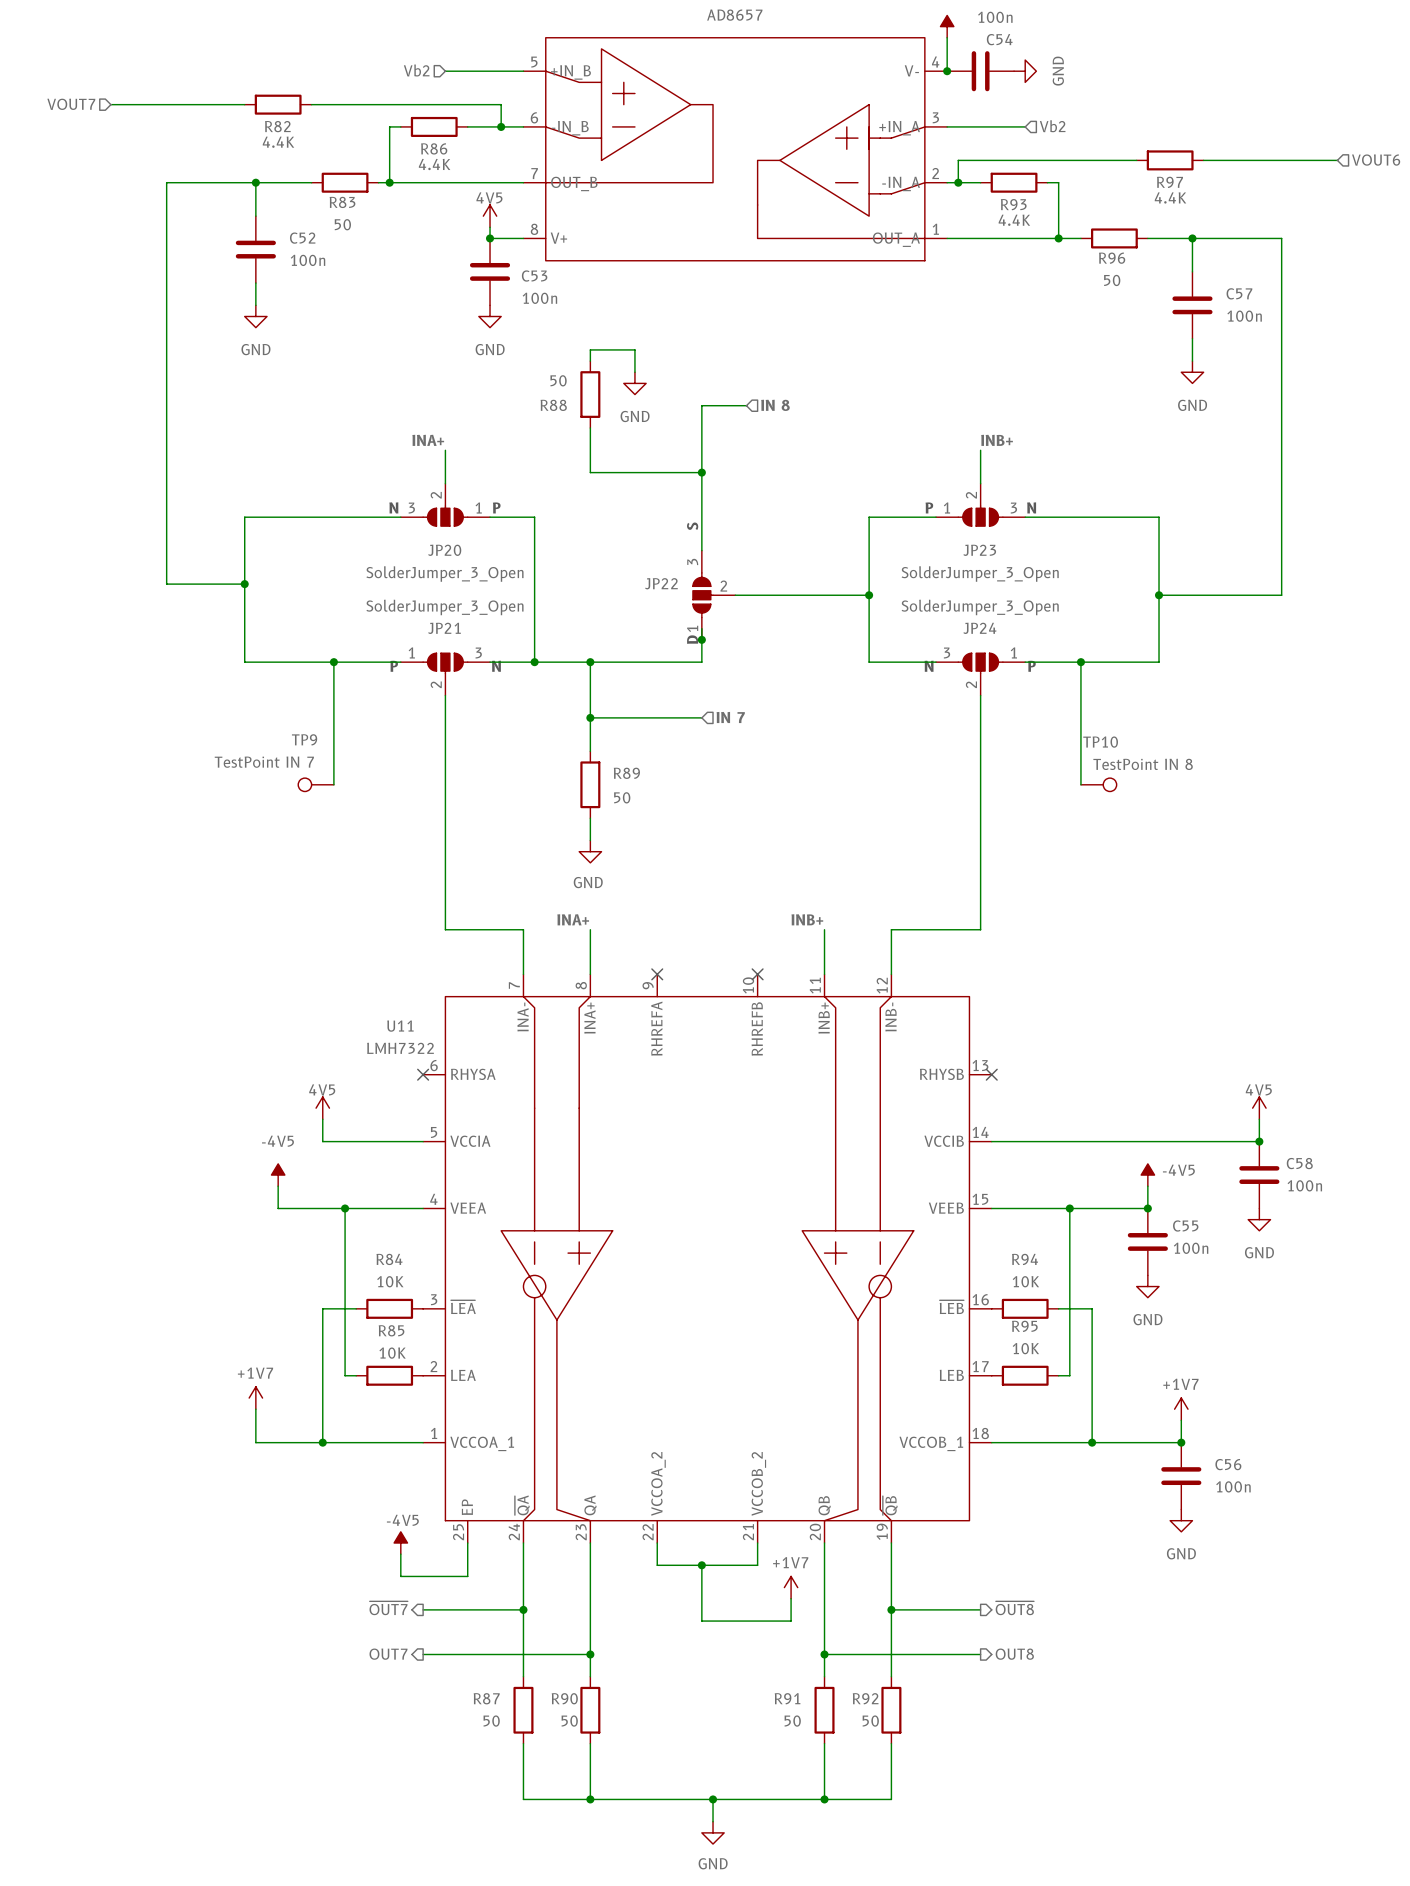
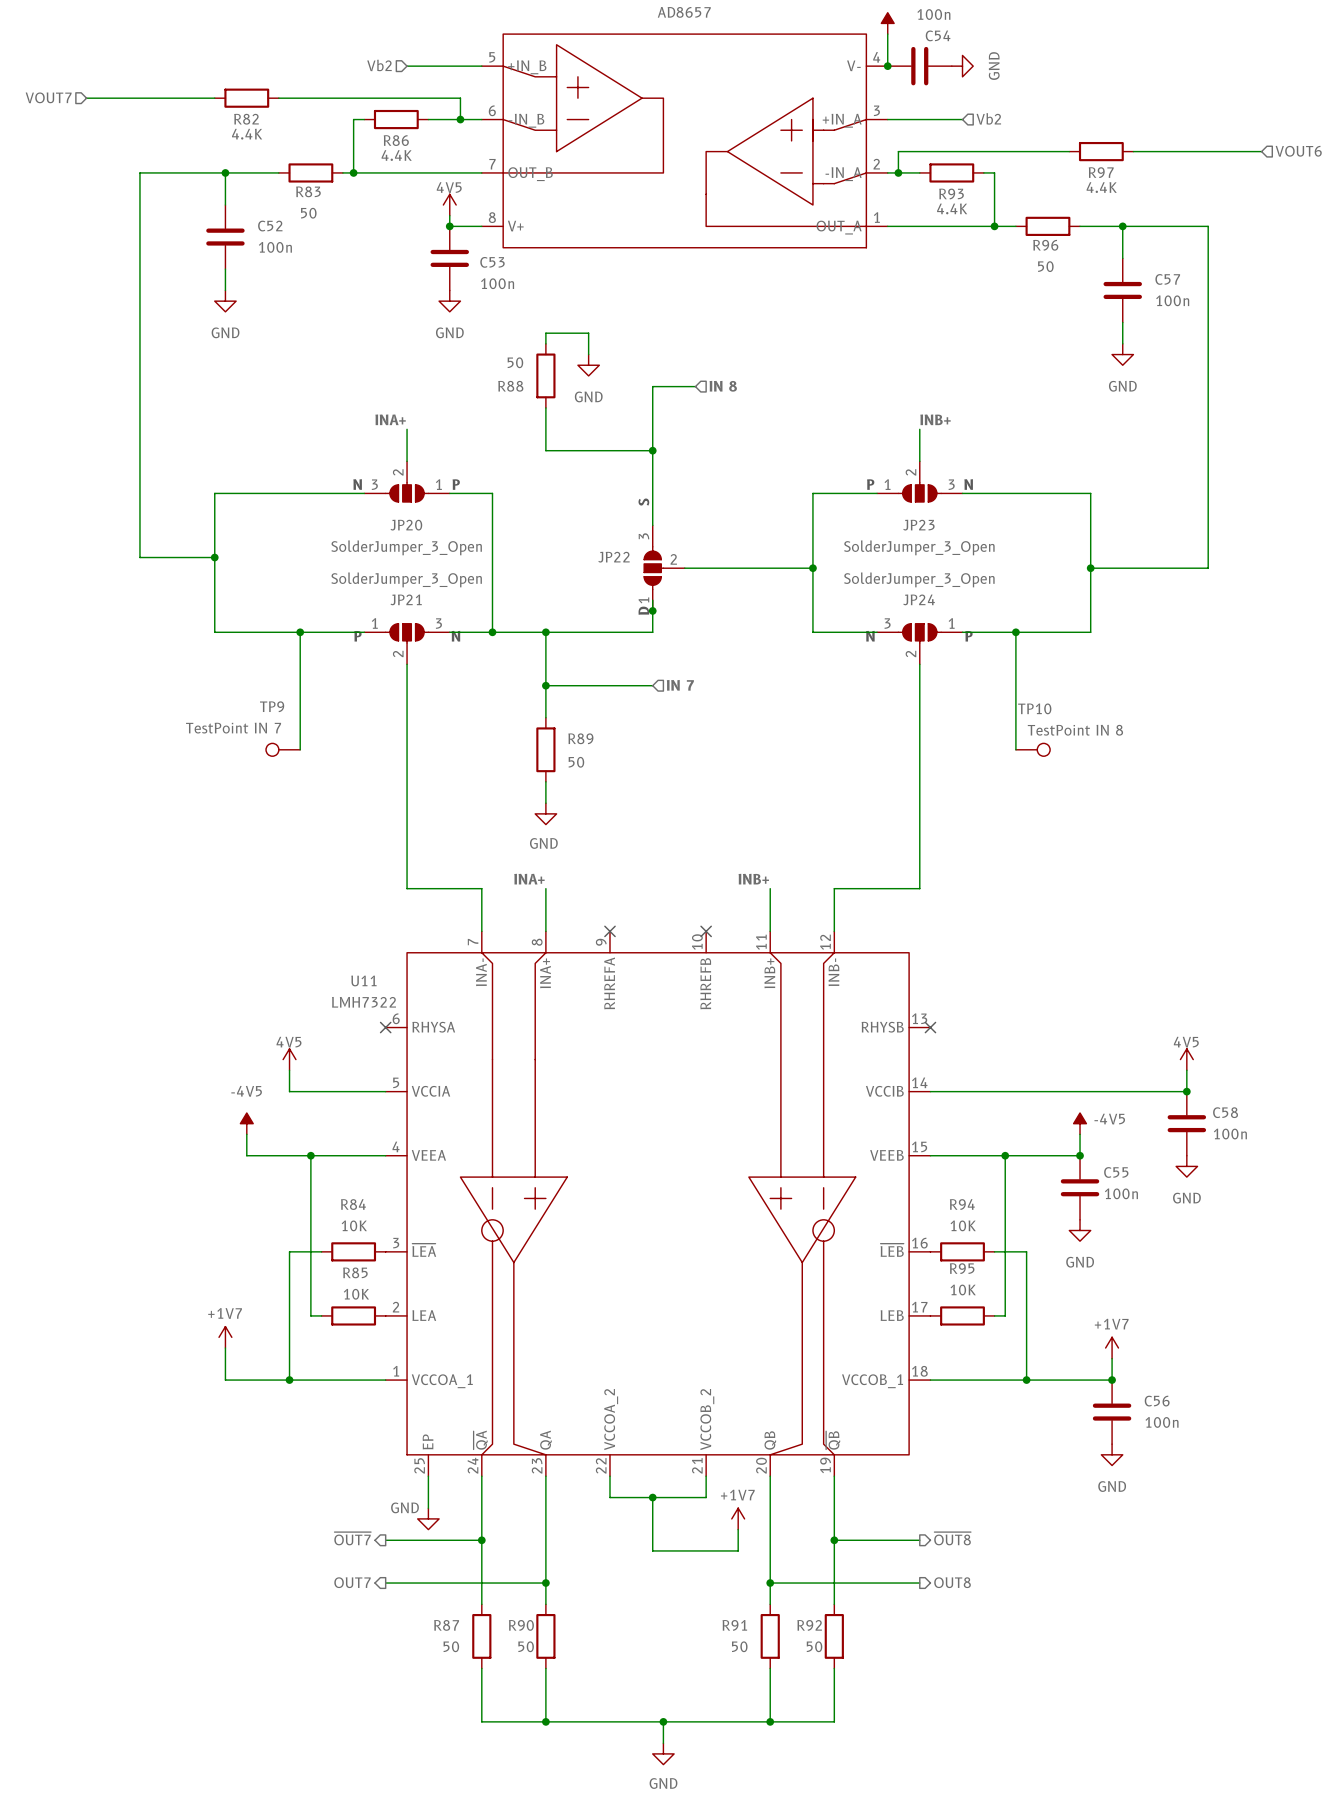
power symbol: -4V5 (400, 1543) -> none
wire: (400, 1554) (400, 1576) (467, 1576) -> none
power symbol: none -> GND (428, 1518)

